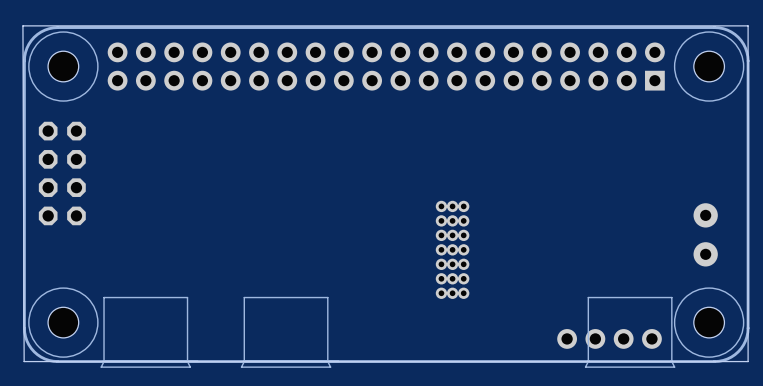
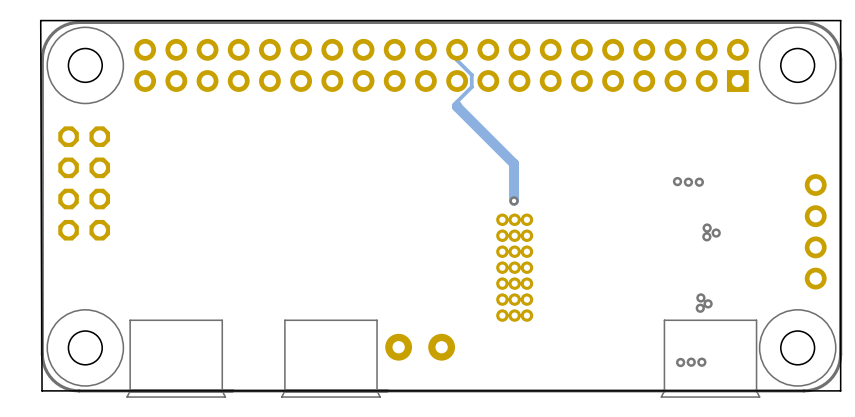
track: none -> (457, 49) (457, 60) (471, 74) (471, 87) (457, 101) (457, 106) (514, 163) (514, 200)
via: none -> (677, 181)
via: none -> (688, 182)
via: none -> (699, 182)
via: none -> (514, 200)
via: none -> (707, 228)
via: none -> (716, 233)
via: none -> (706, 236)
part: (705, 234) -> none
via: none -> (700, 297)
via: none -> (708, 303)
via: none -> (700, 308)
part: none -> (420, 347)
via: none -> (680, 362)
via: none -> (691, 362)
via: none -> (701, 362)
part rotation: 0° (609, 338) -> 90° clockwise (815, 231)
part position: (609, 338) -> (815, 231)

